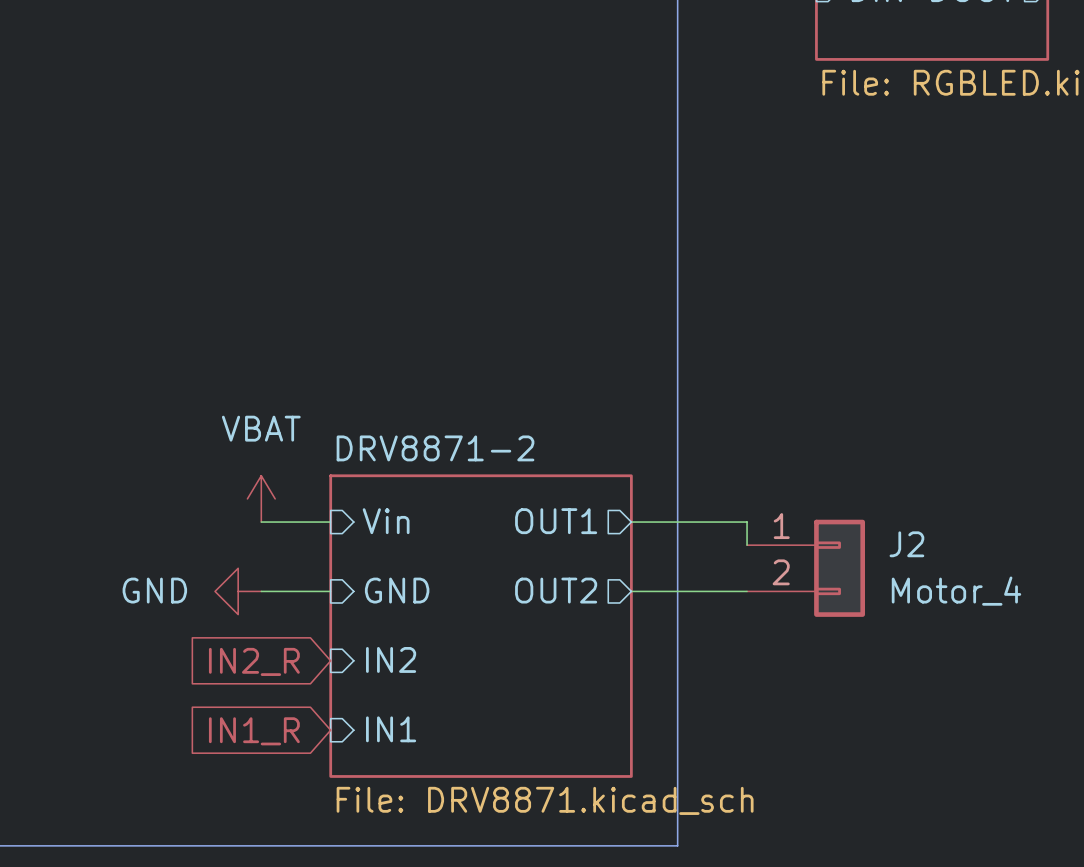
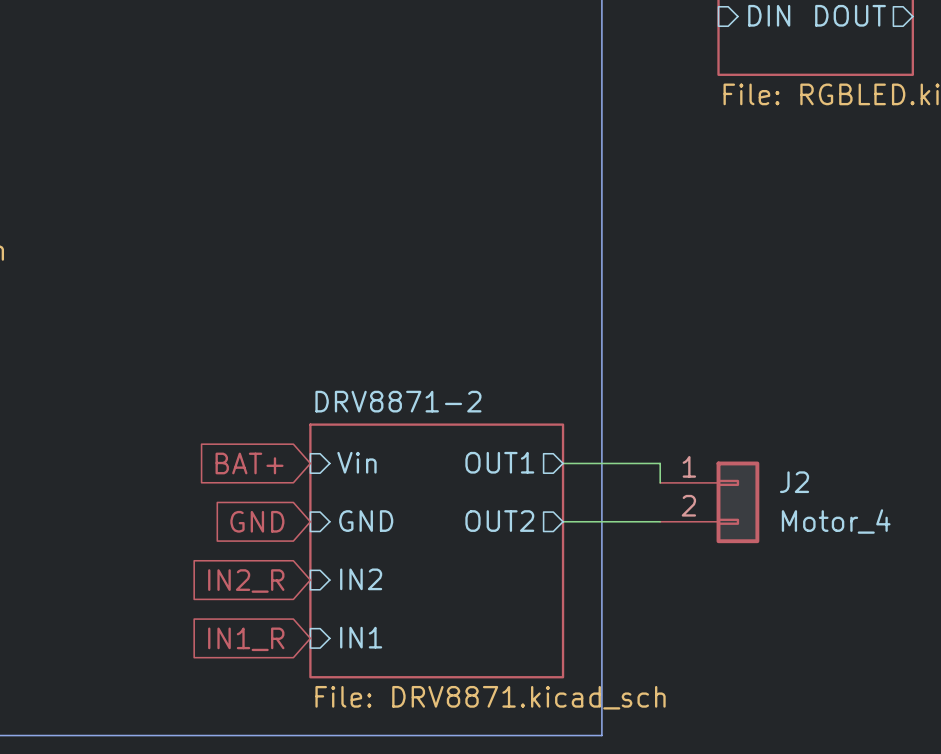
power symbol: VBAT (261, 498) -> none
global label: none -> BAT+ (249, 463)
wire: (261, 522) (330, 522) -> none
power symbol: GND (238, 591) -> none
wire: (261, 591) (330, 591) -> none
global label: none -> GND (257, 521)

